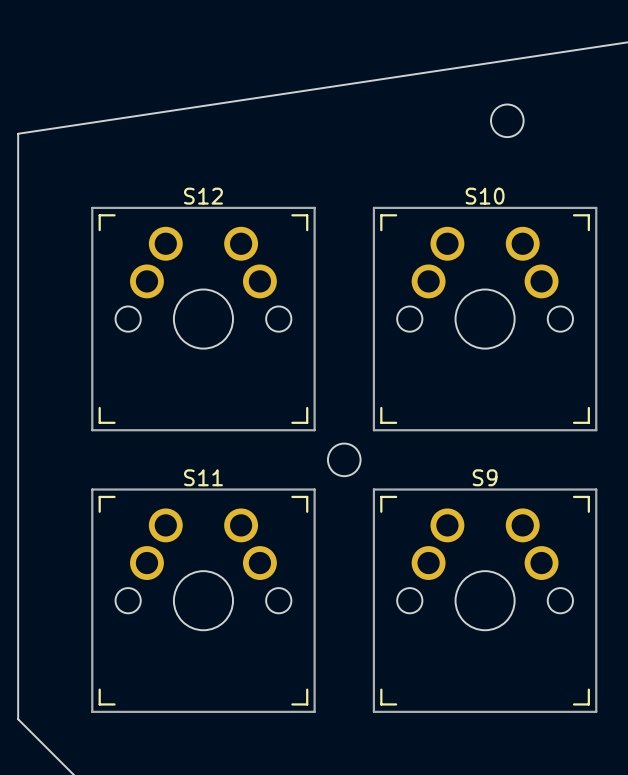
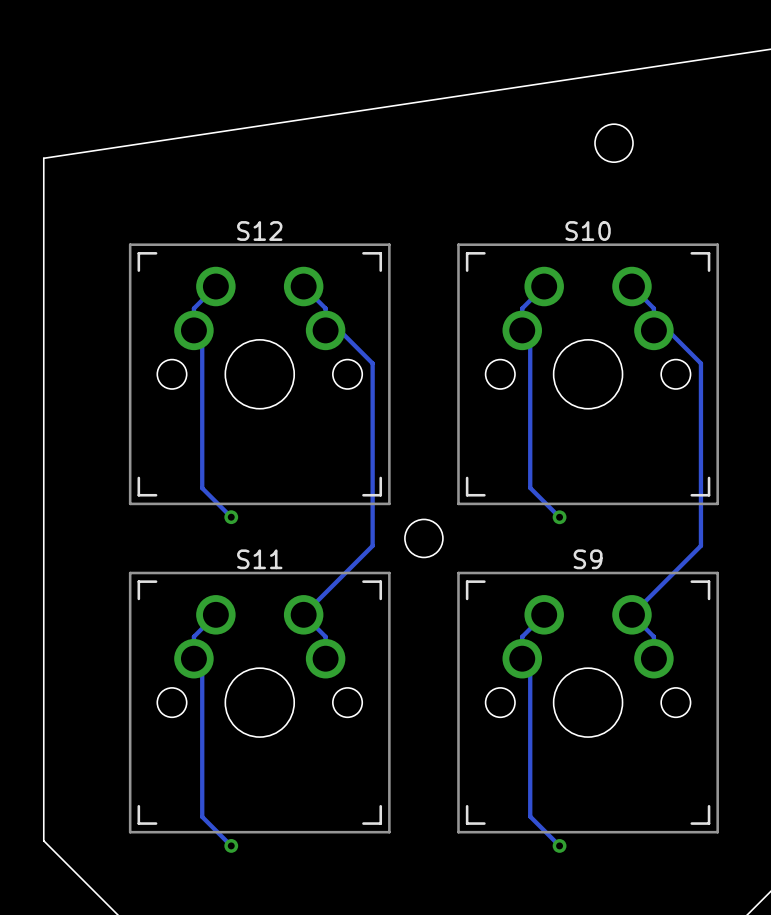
track: none -> (215, 286) (193, 308) (193, 330) (202, 338) (202, 488) (231, 517)
track: none -> (303, 286) (325, 308) (325, 330) (339, 330) (372, 363) (372, 545) (303, 614) (325, 636) (325, 658)
track: none -> (544, 286) (522, 308) (522, 330) (530, 338) (530, 487) (559, 517)
track: none -> (631, 286) (653, 308) (653, 330) (667, 330) (700, 363) (700, 545) (631, 614) (653, 636) (653, 658)
via: none -> (231, 517)
via: none -> (559, 517)
track: none -> (215, 614) (193, 636) (193, 658) (202, 667) (202, 816) (231, 845)
track: none -> (544, 614) (522, 636) (522, 658) (530, 666) (530, 816) (559, 845)
via: none -> (231, 845)
via: none -> (559, 845)

